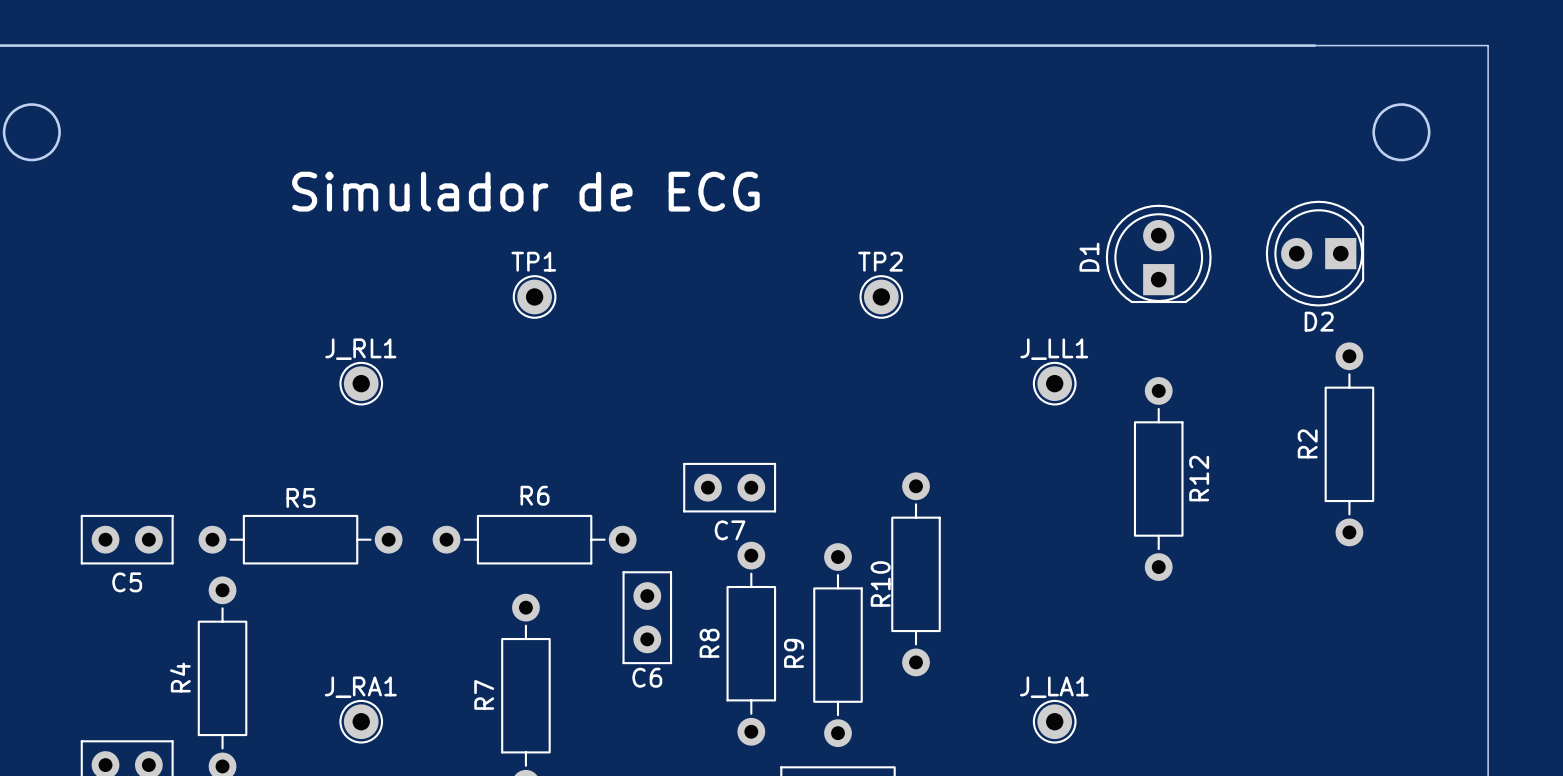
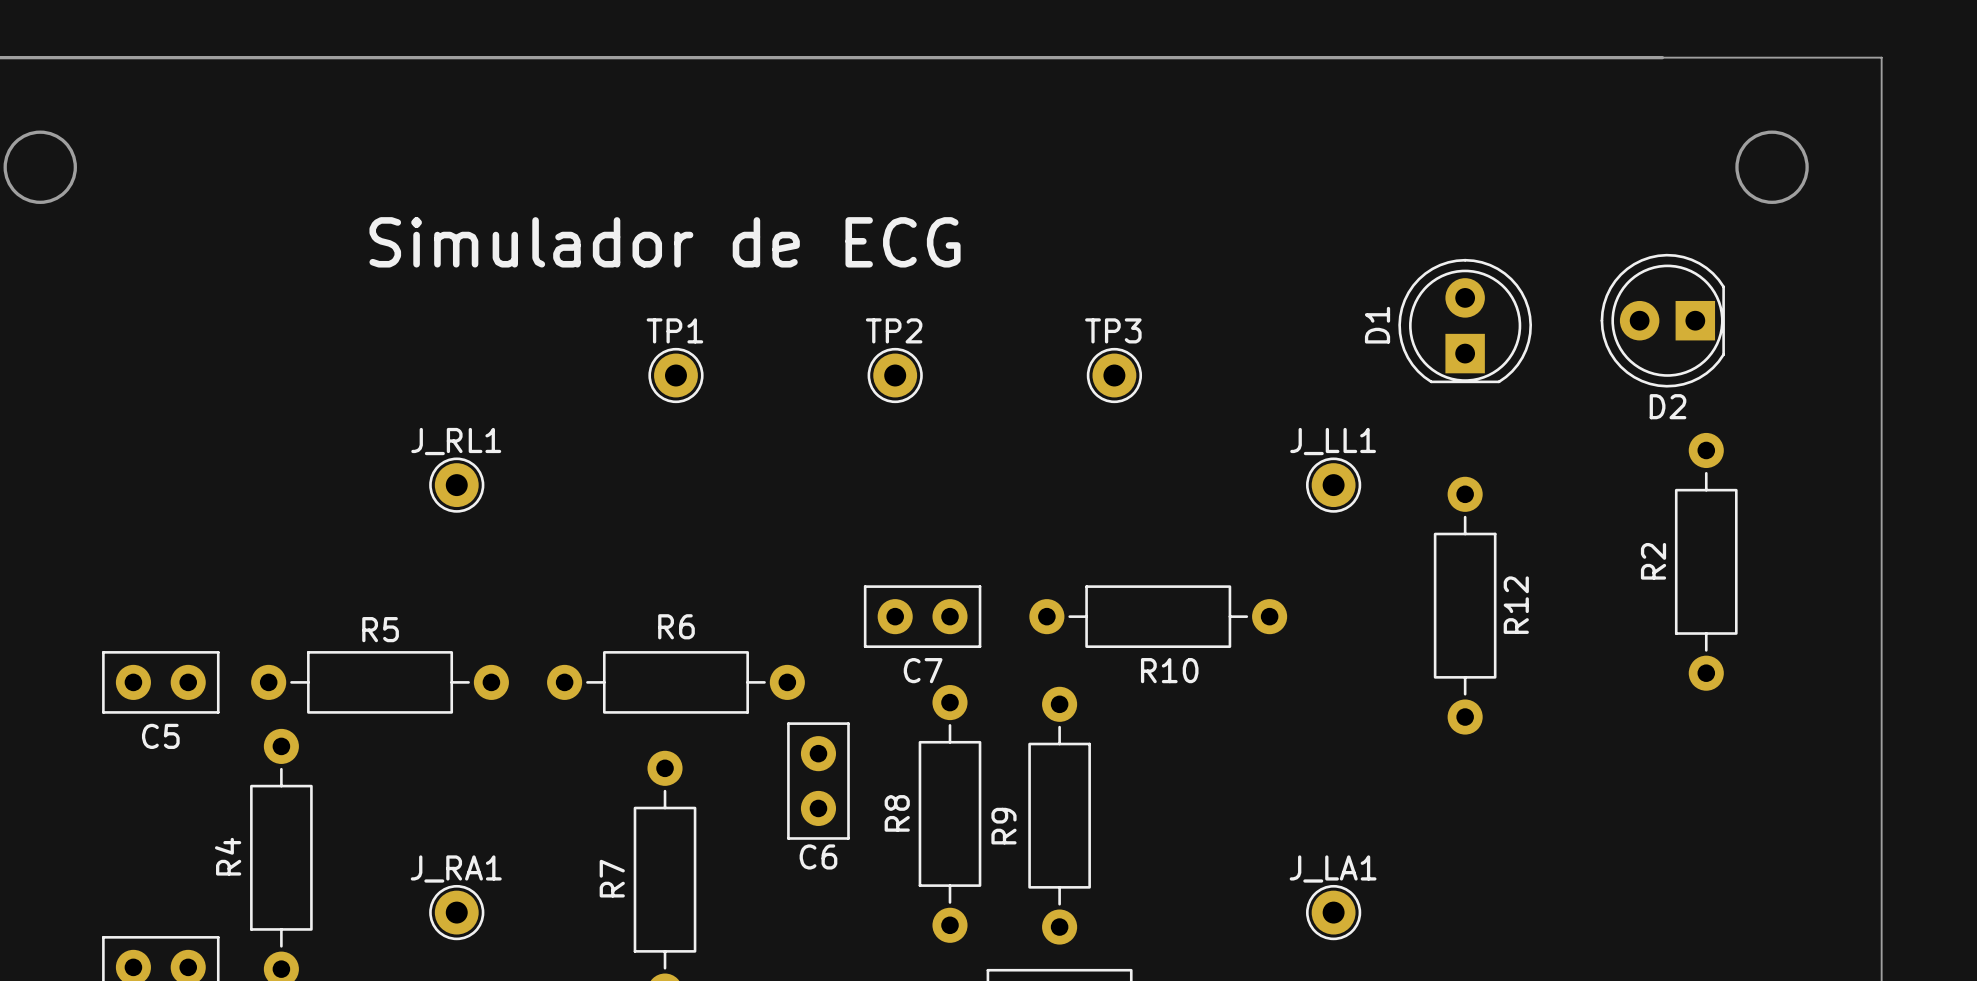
TP2 name: TP2 (880, 261) -> TP3 (1113, 330)
TP2: none -> (895, 375)
R10 rotation: 0° (916, 574) -> 90° clockwise (1158, 616)
R10 name position: R10 (880, 584) -> R10 (1169, 670)

